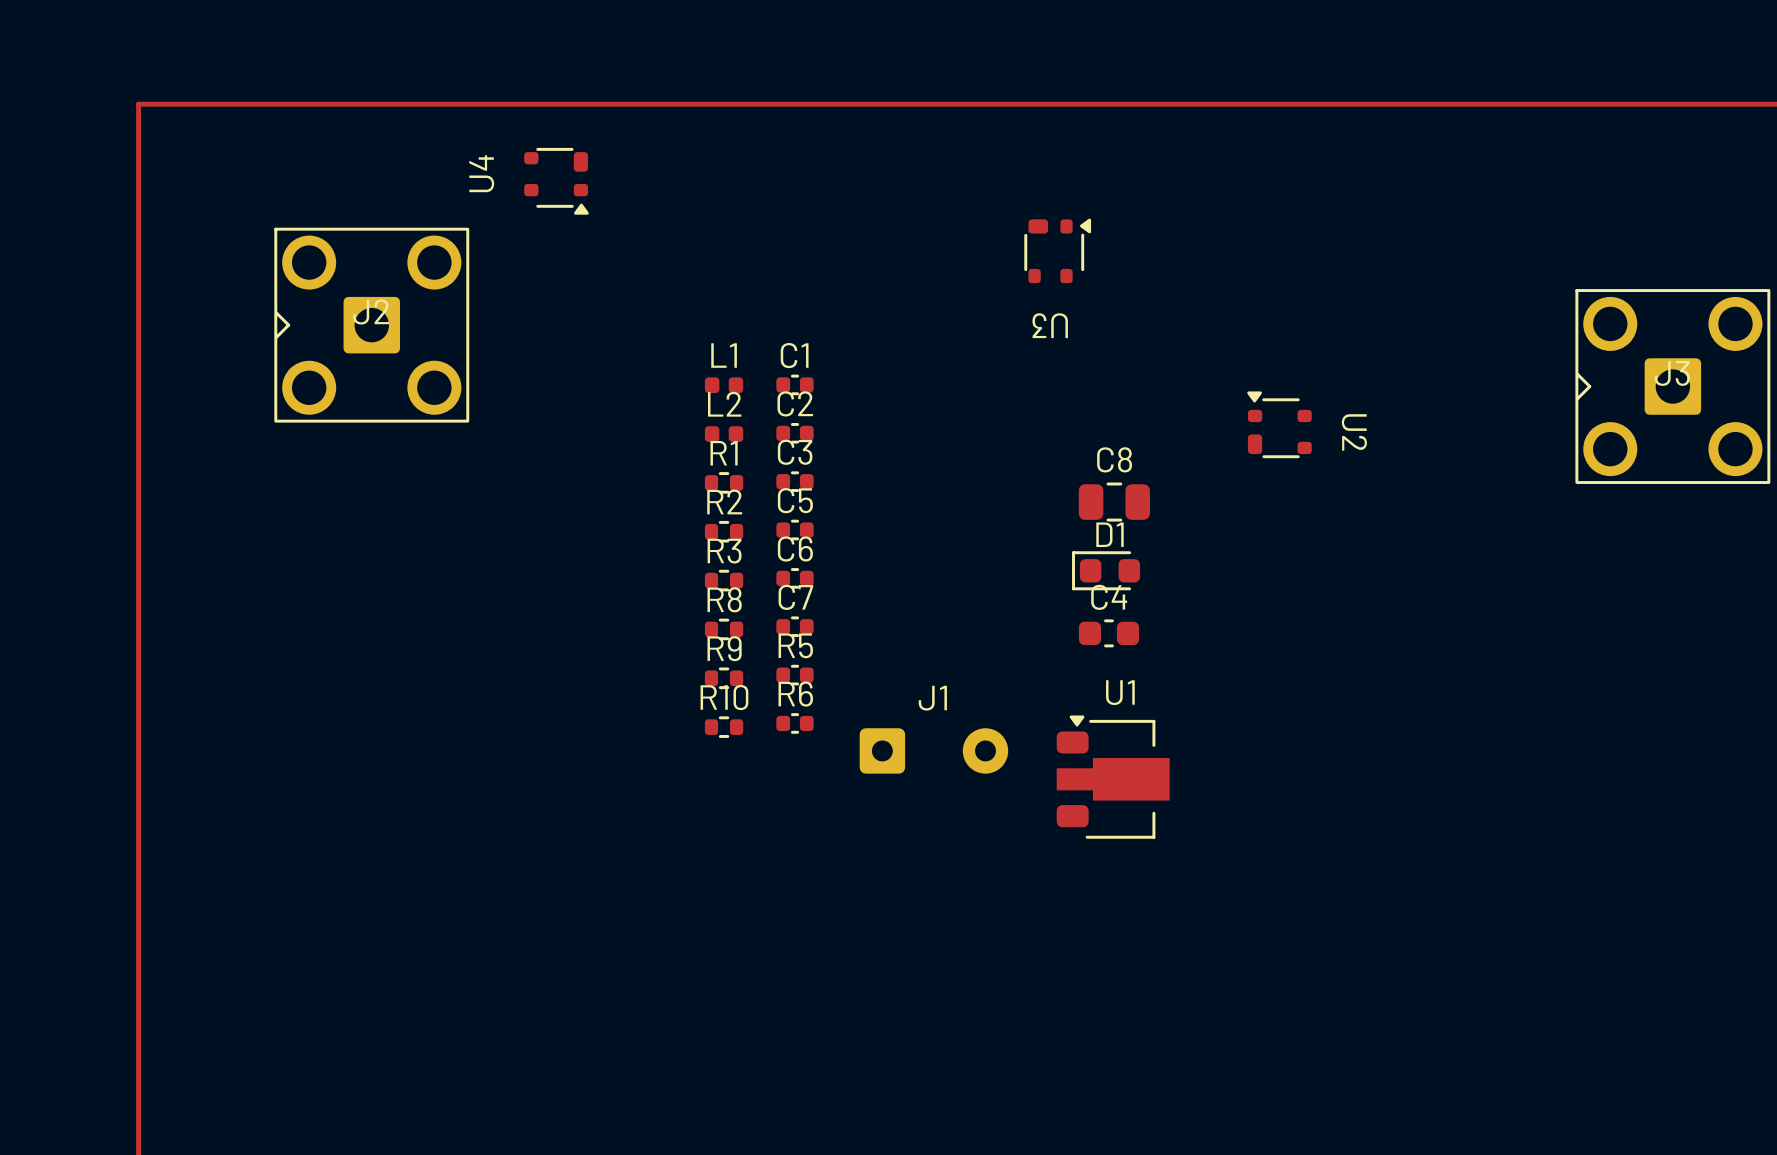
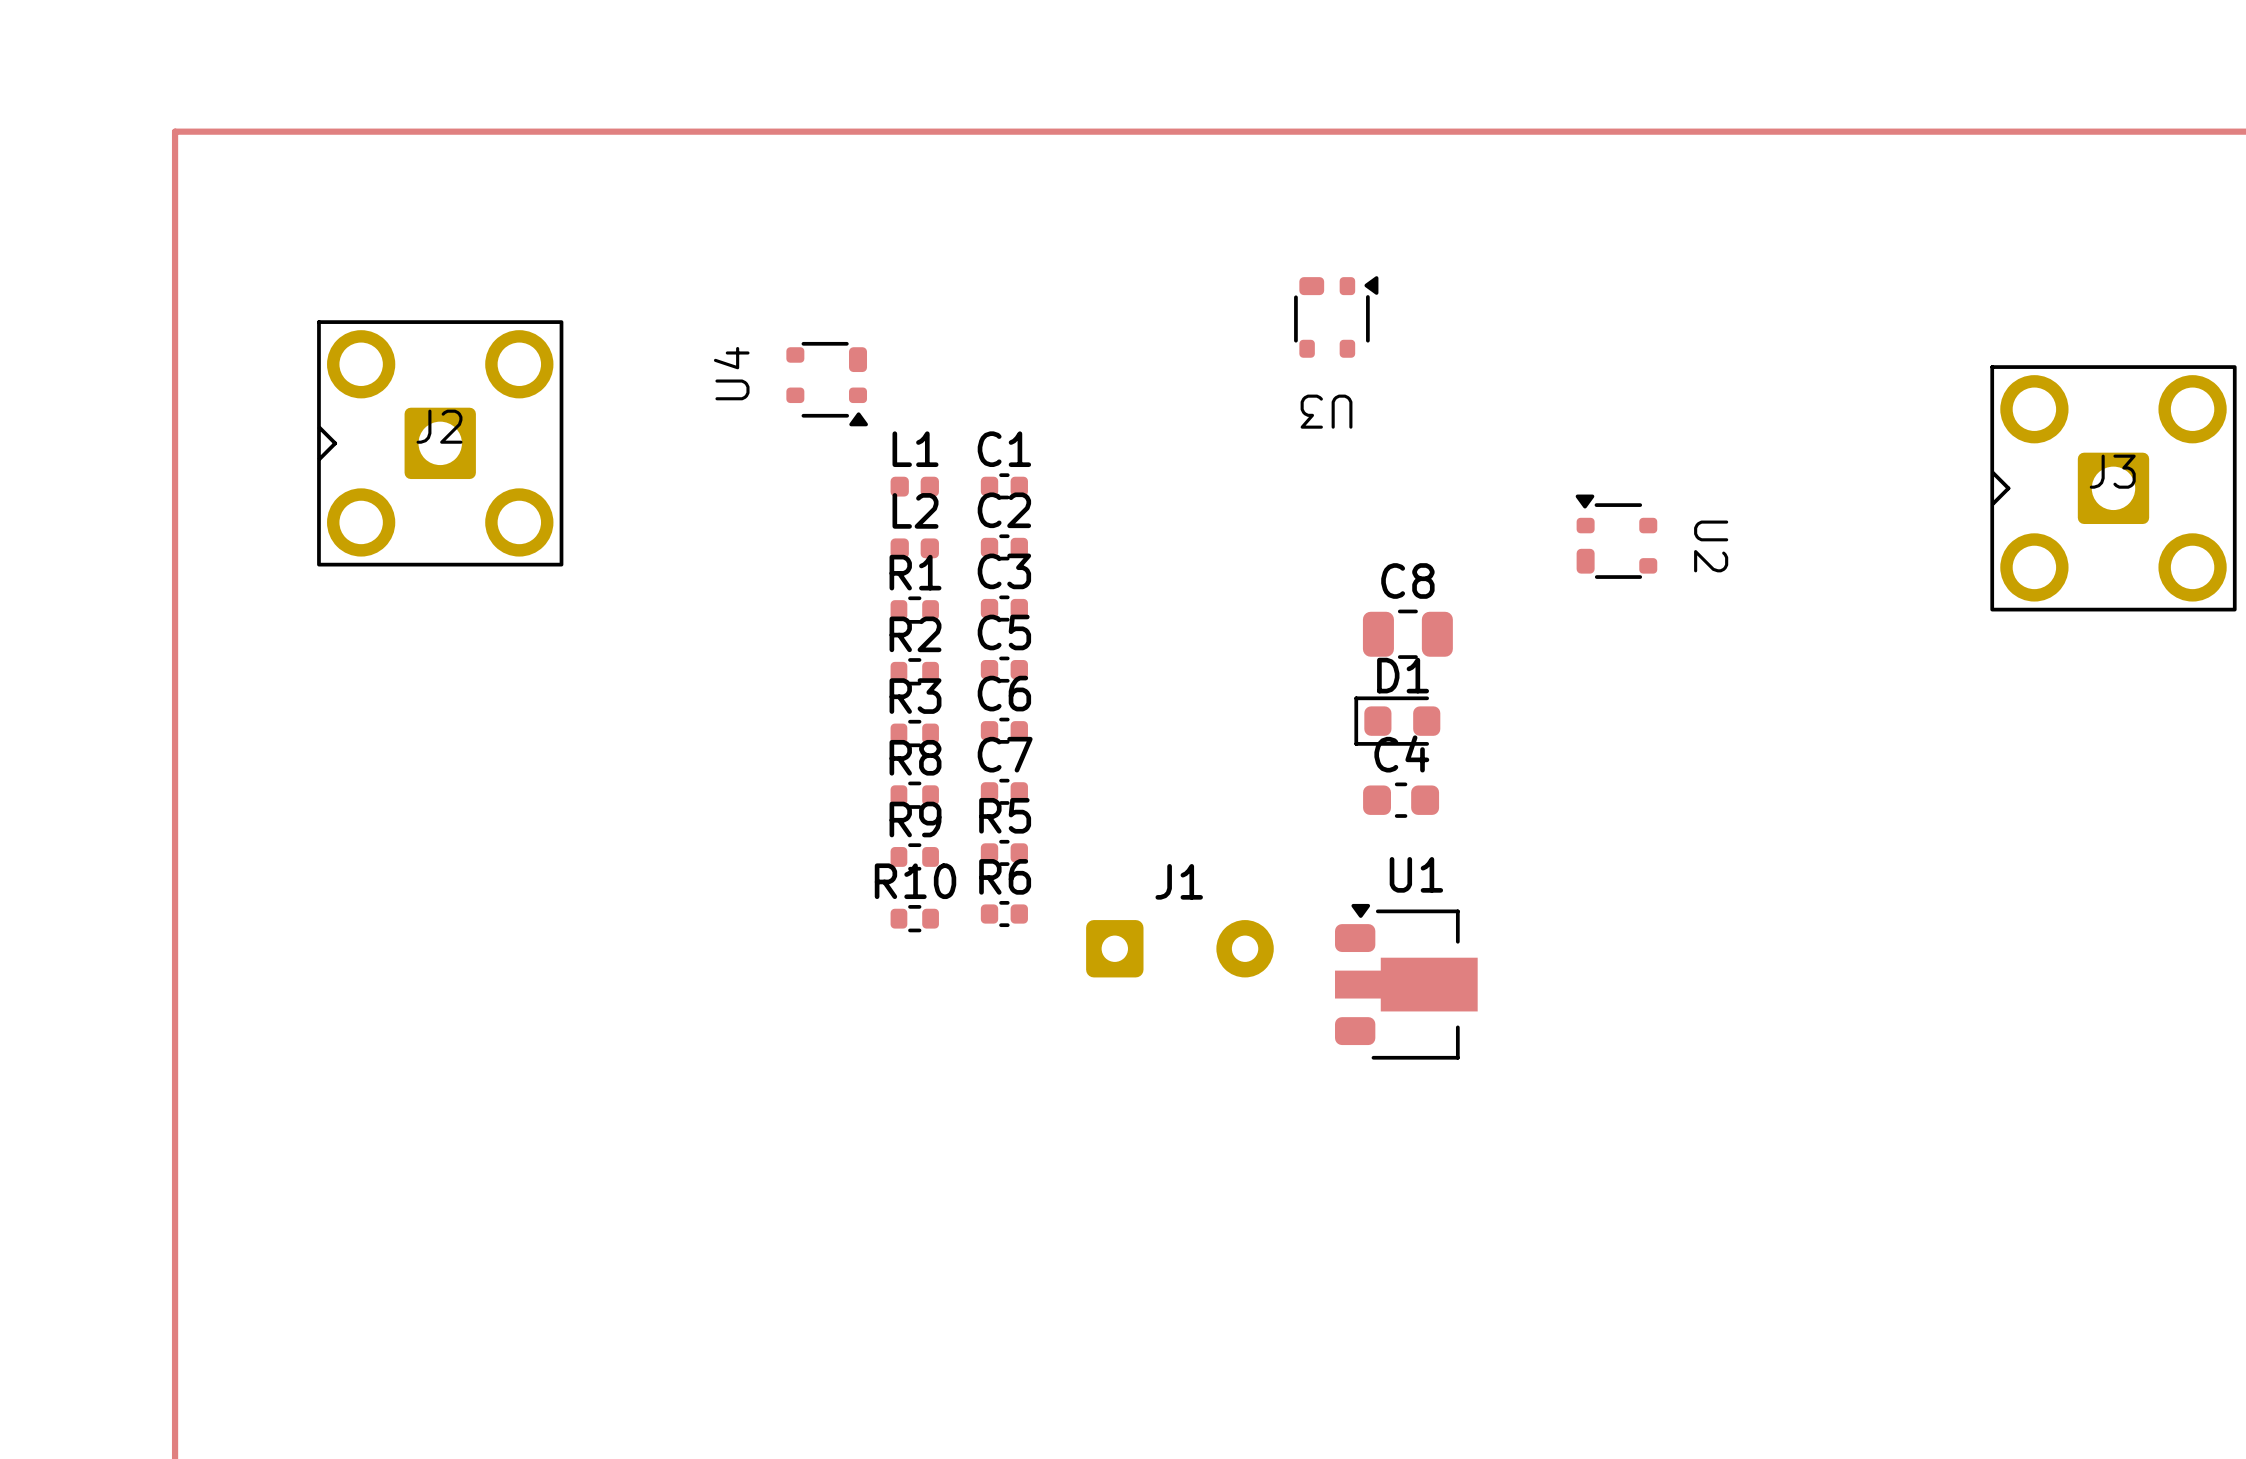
U4 position: (556, 181) -> (827, 384)
J2 position: (371, 325) -> (440, 443)

